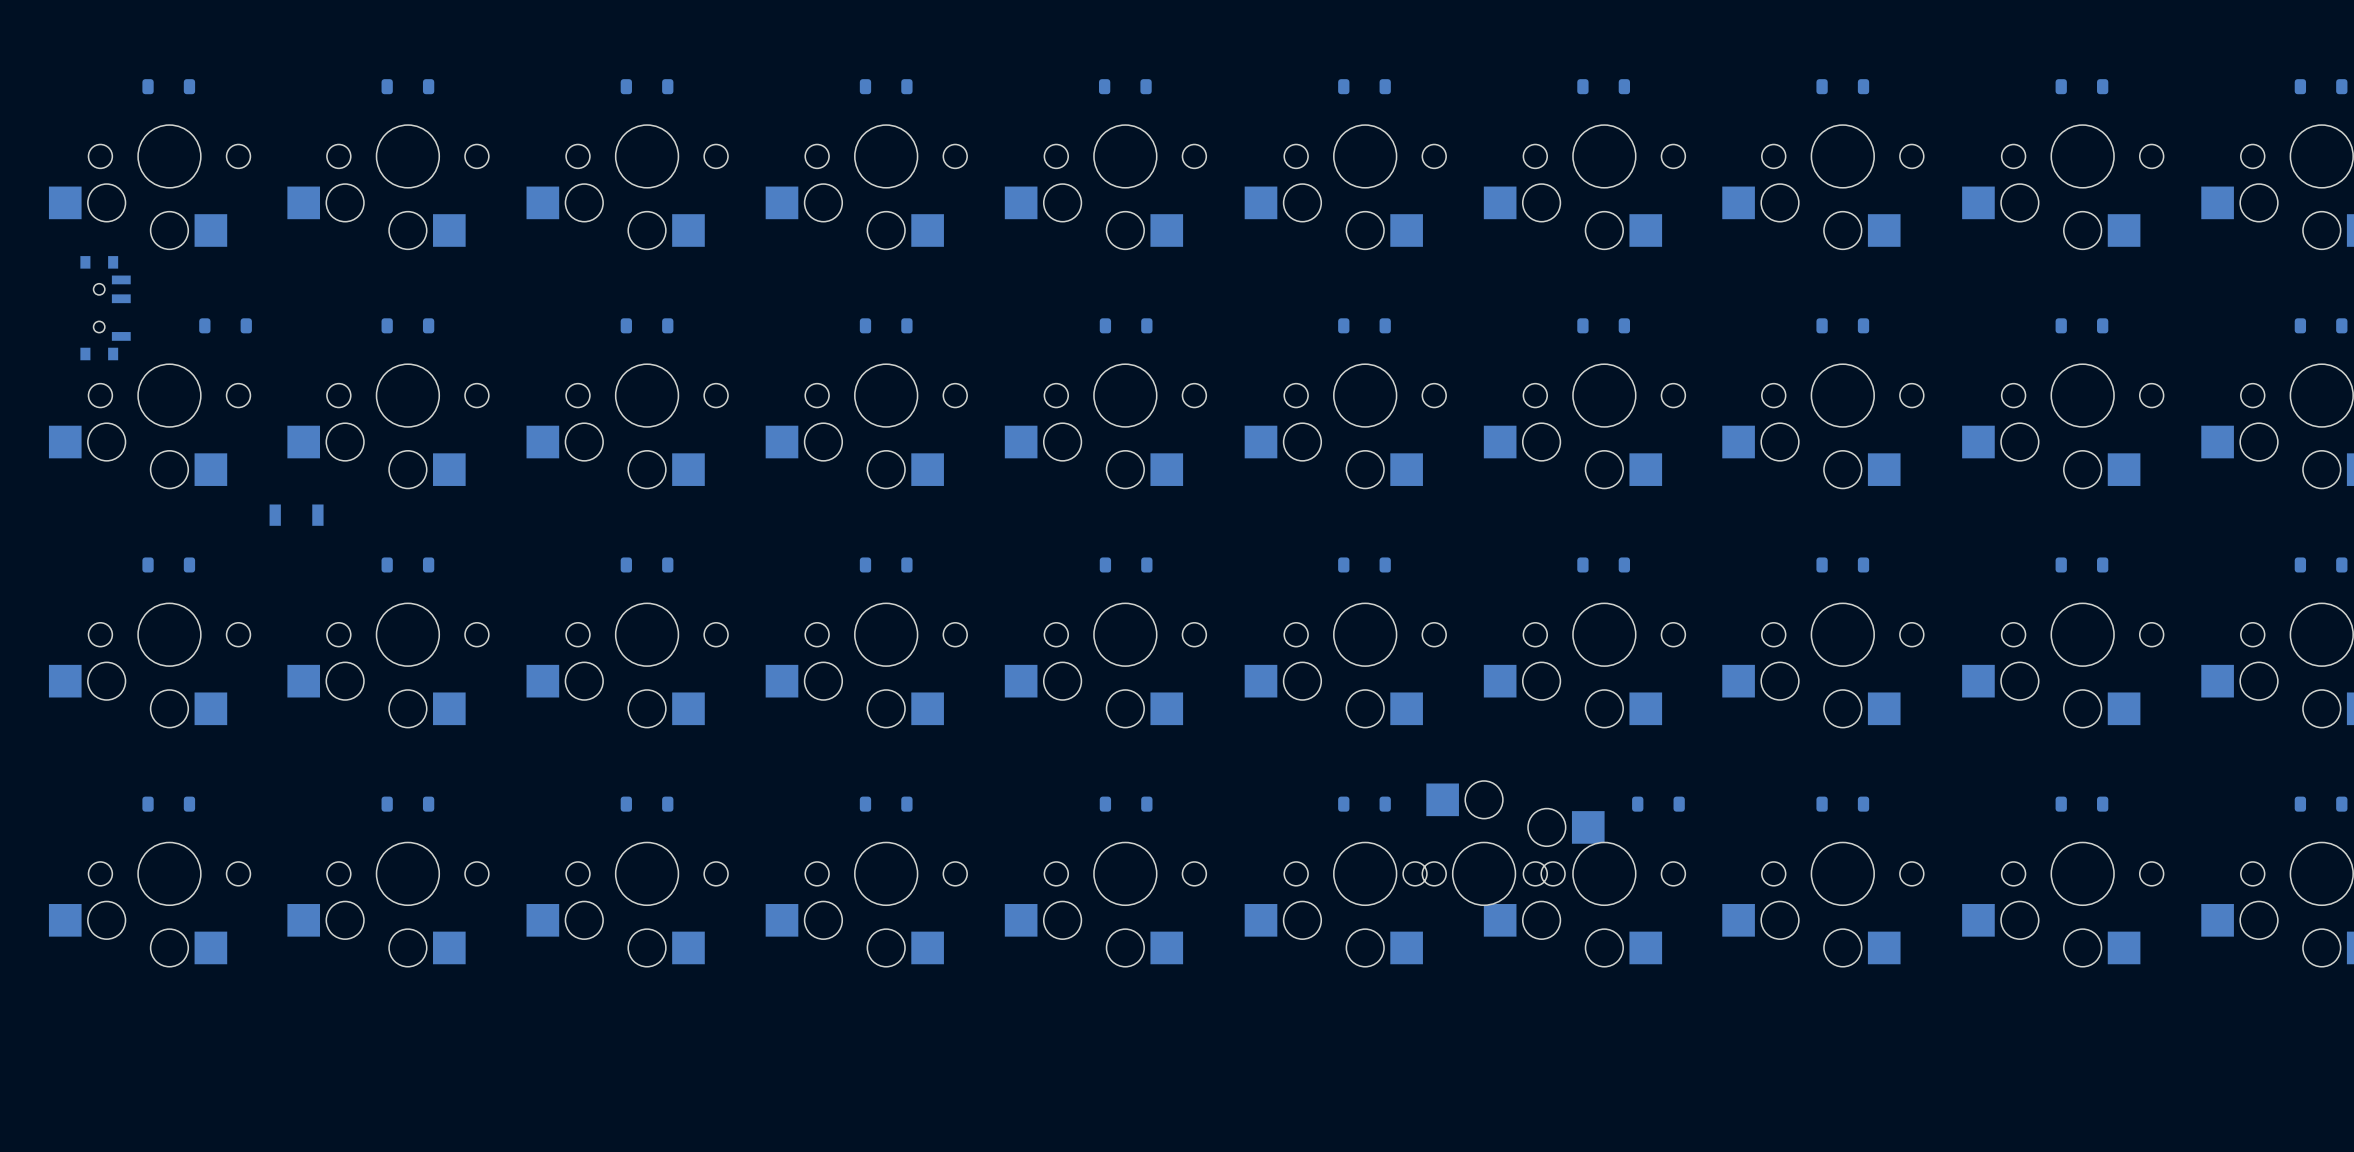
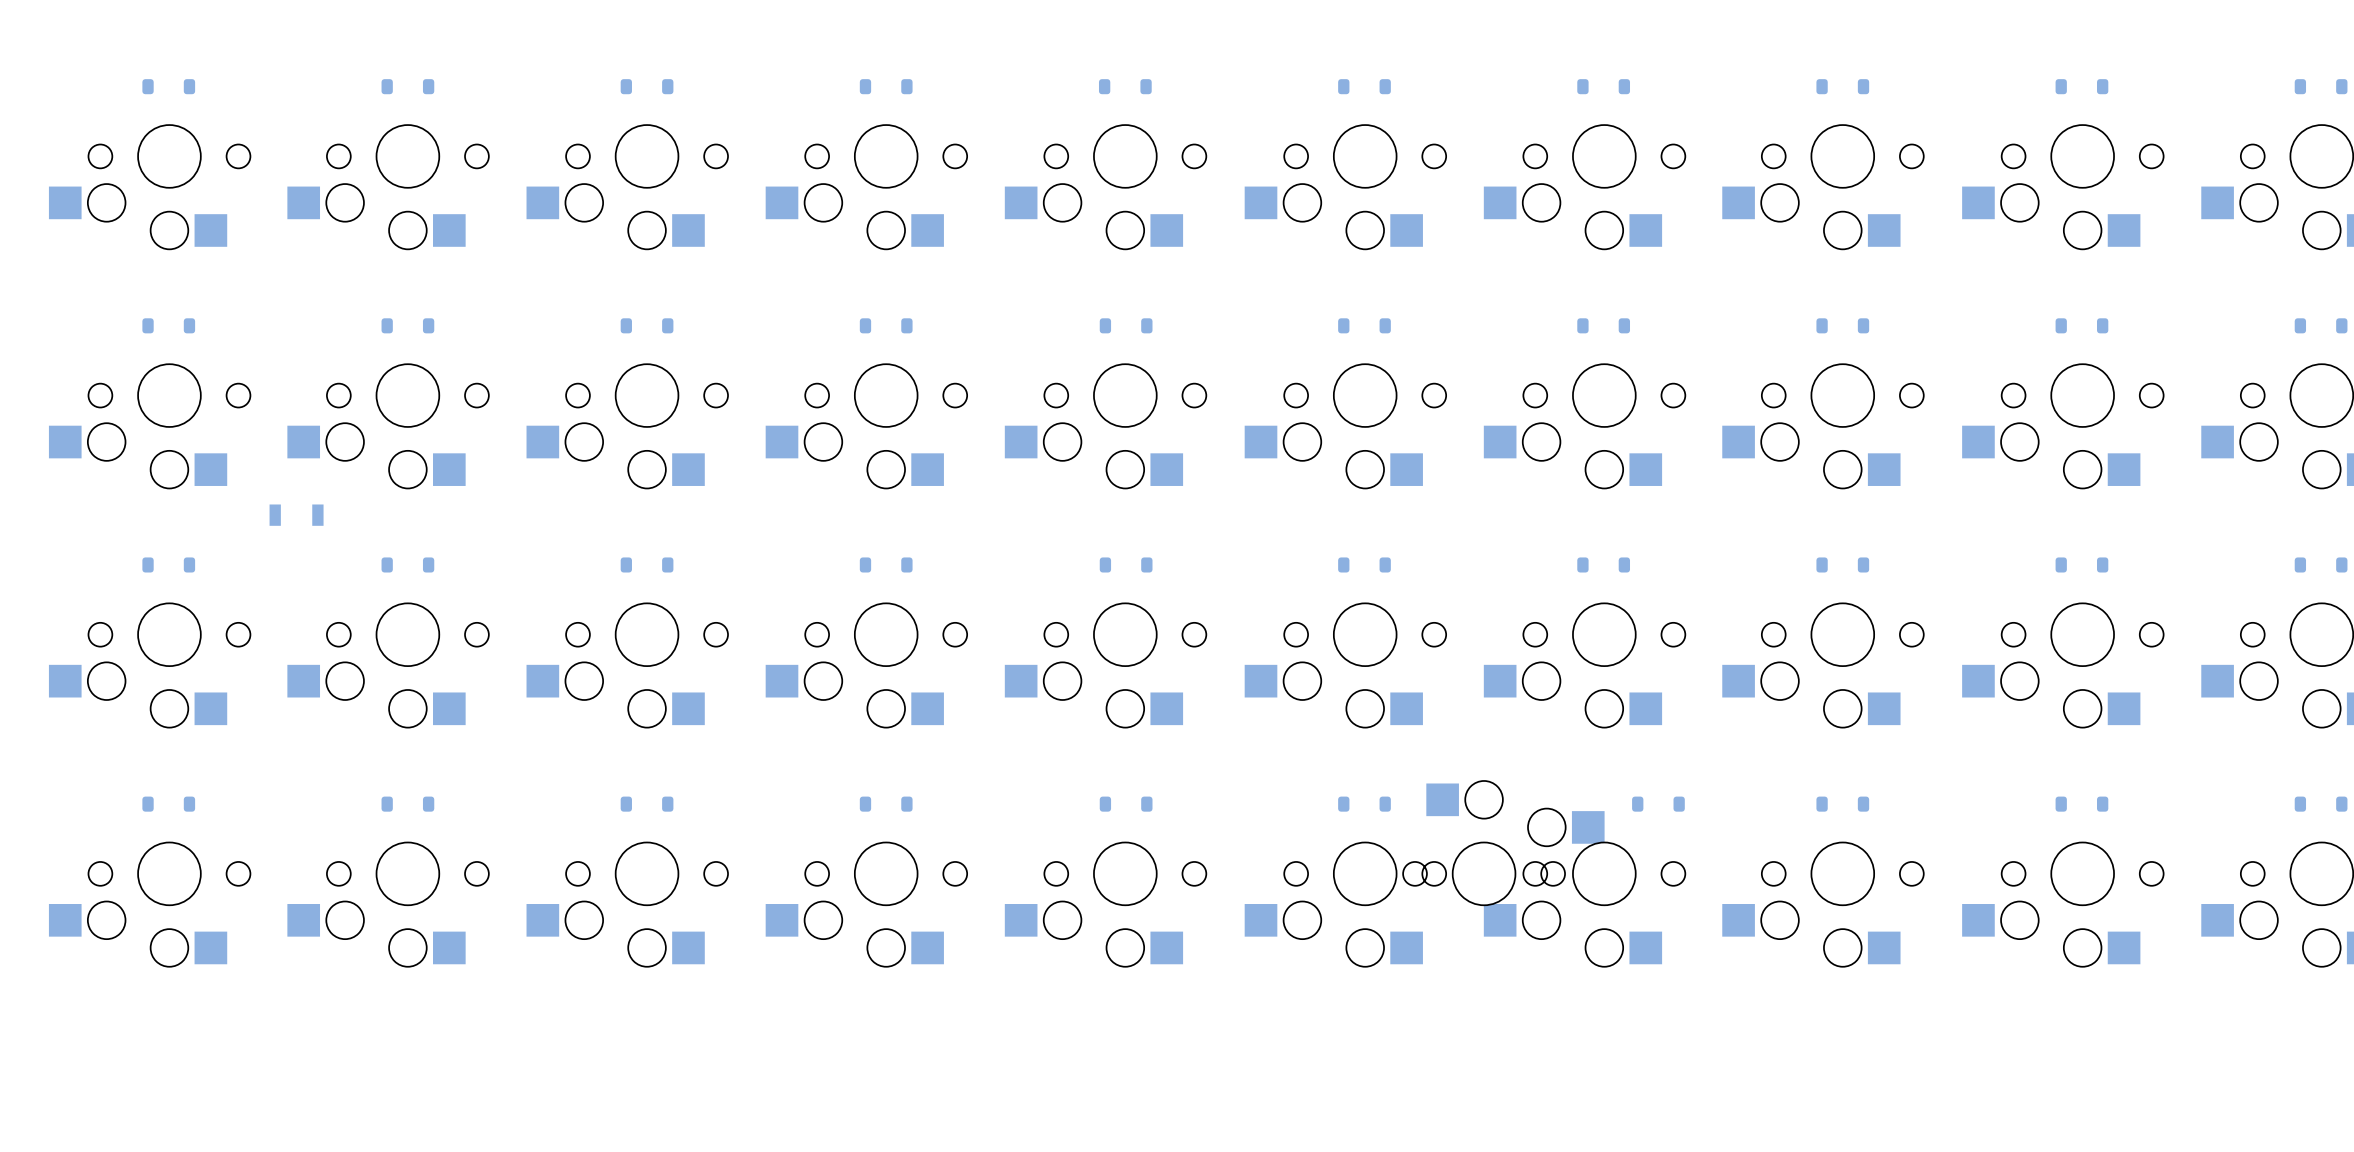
part: (105, 308) -> none
part position: (225, 325) -> (168, 325)

